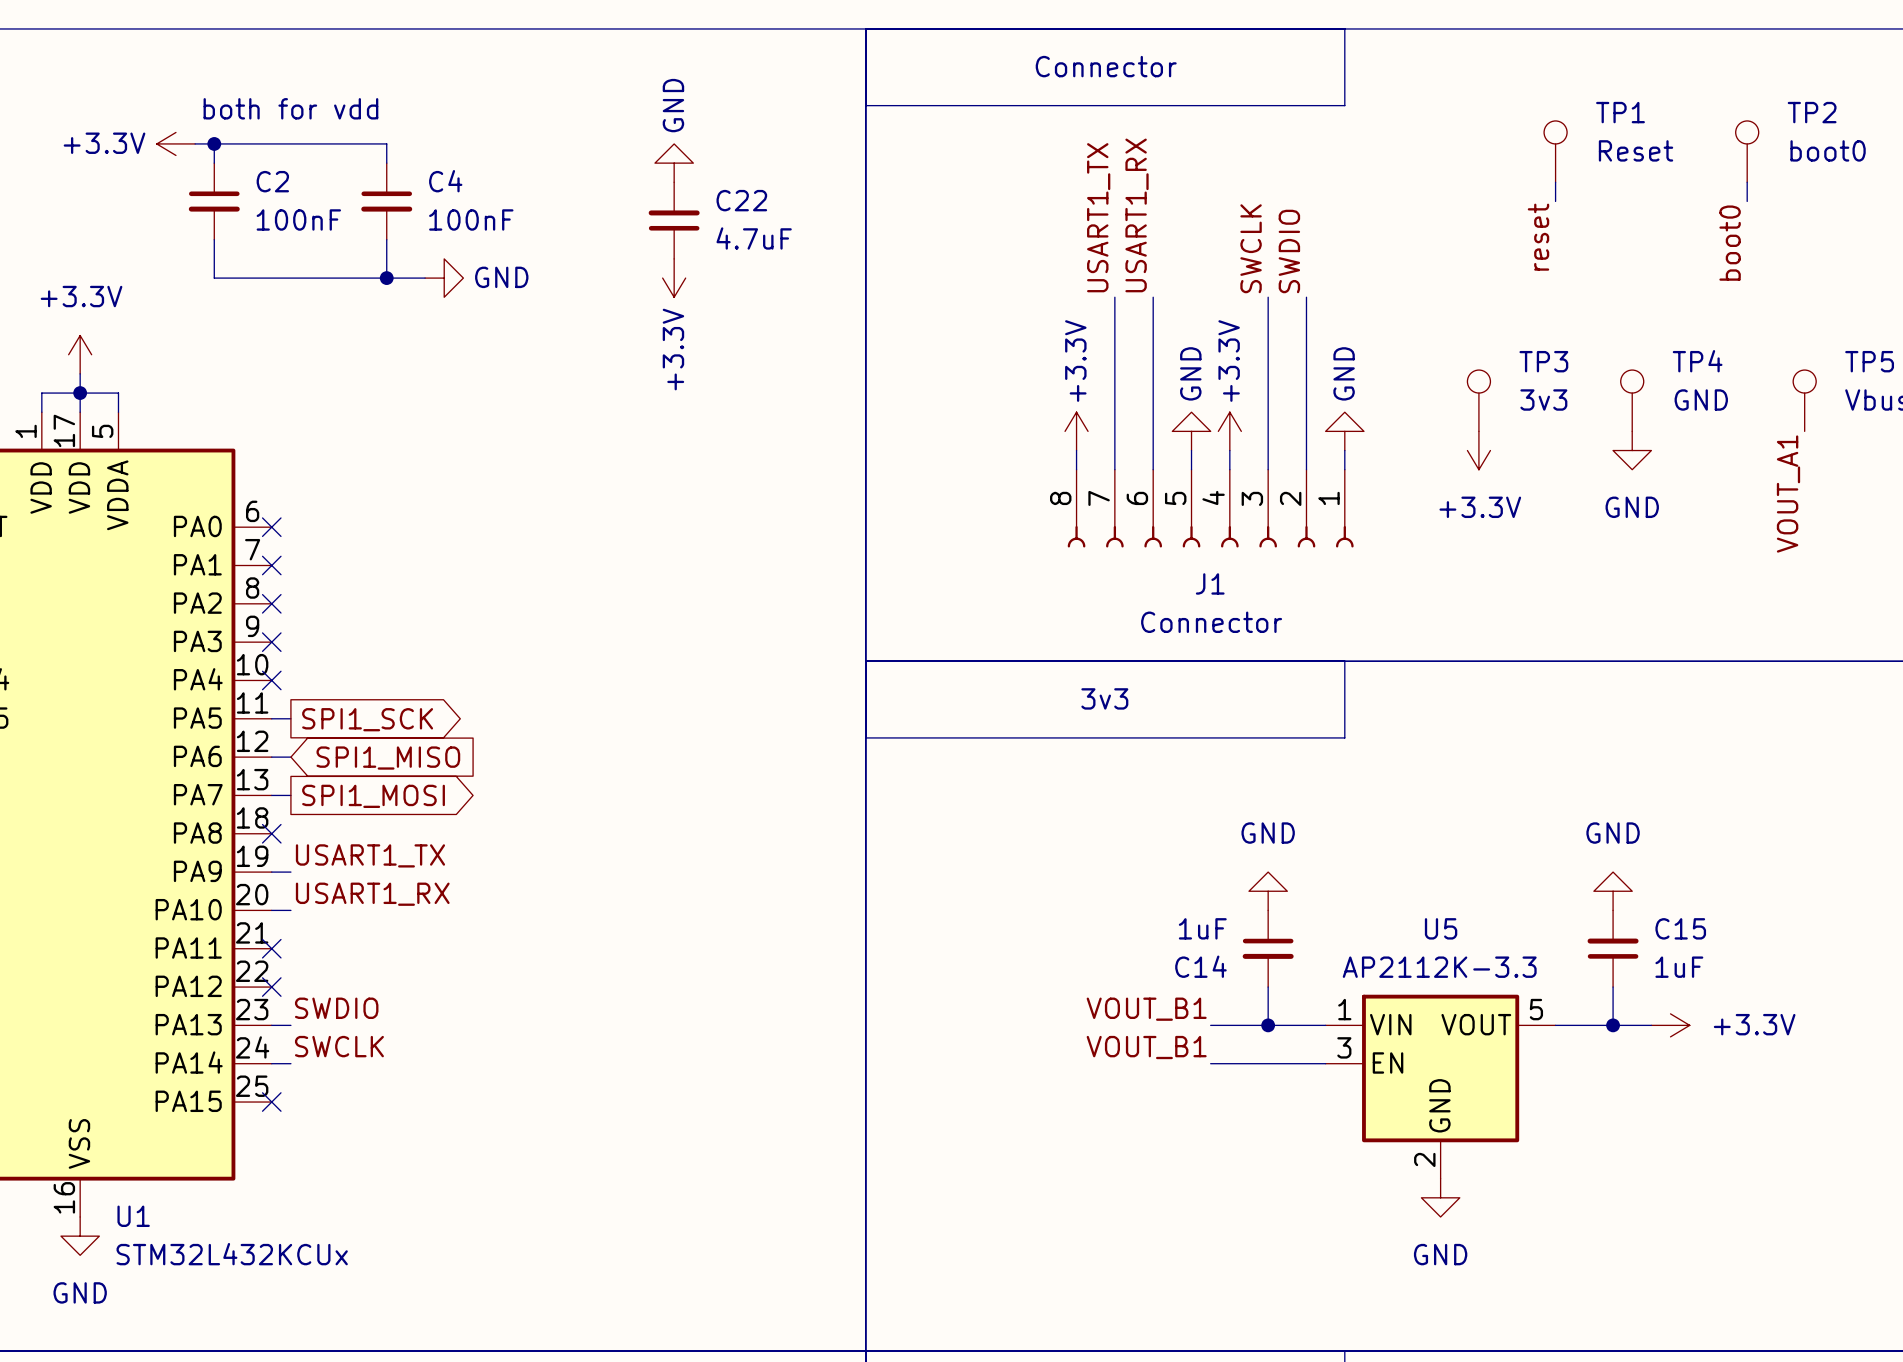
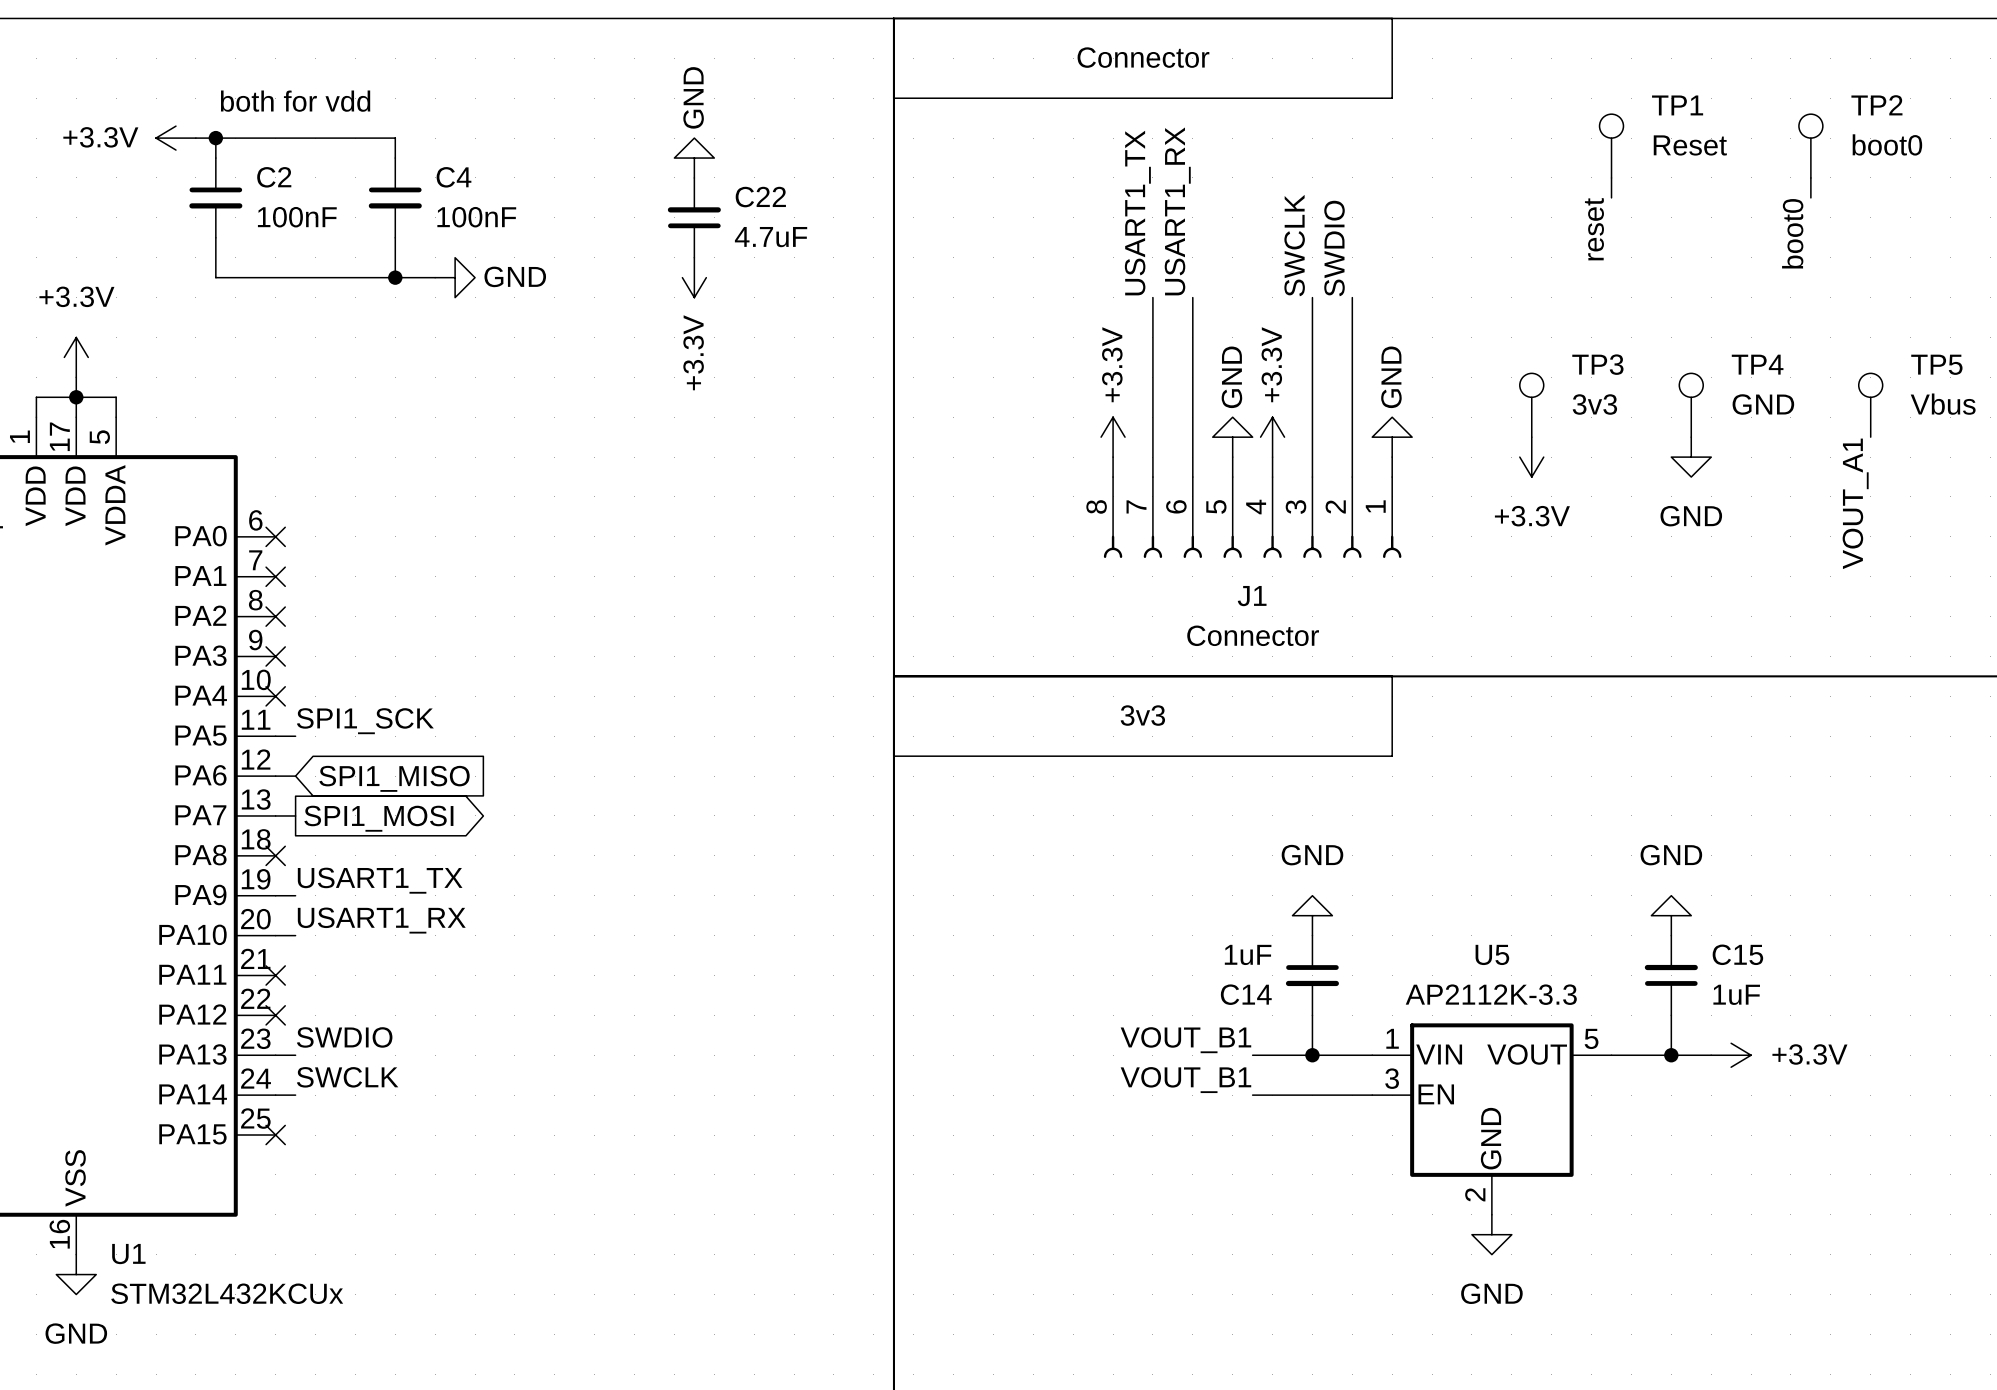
label: none -> SPI1_SCK (365, 721)
global label: SPI1_SCK (367, 719) -> none

